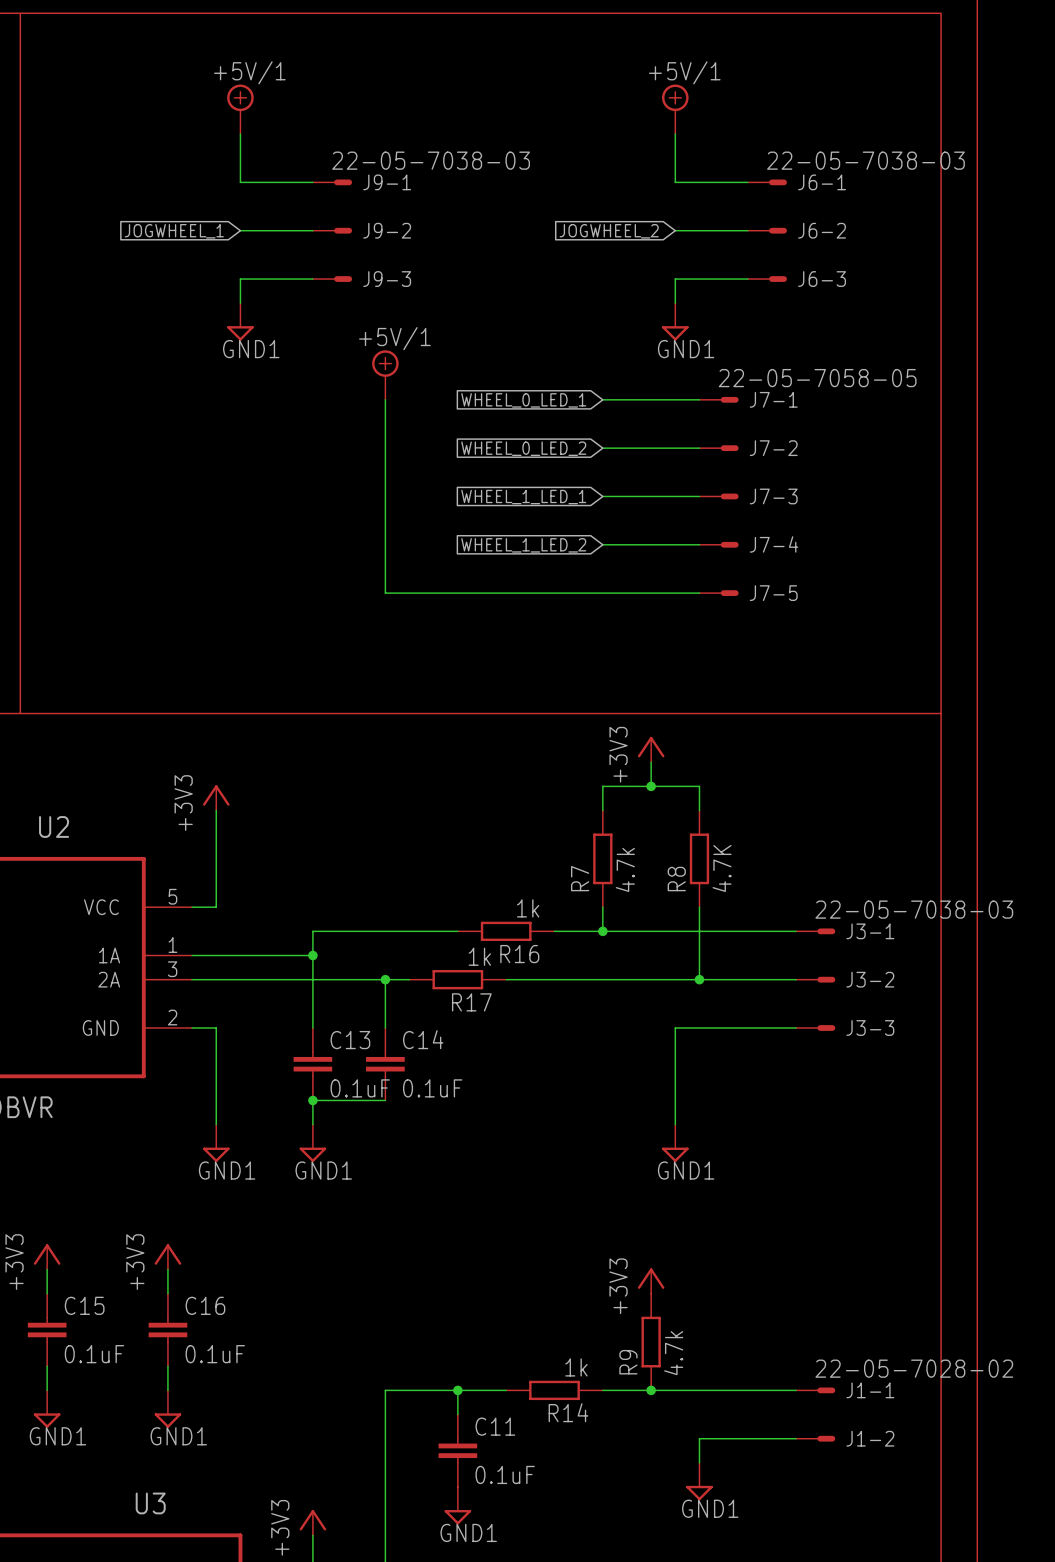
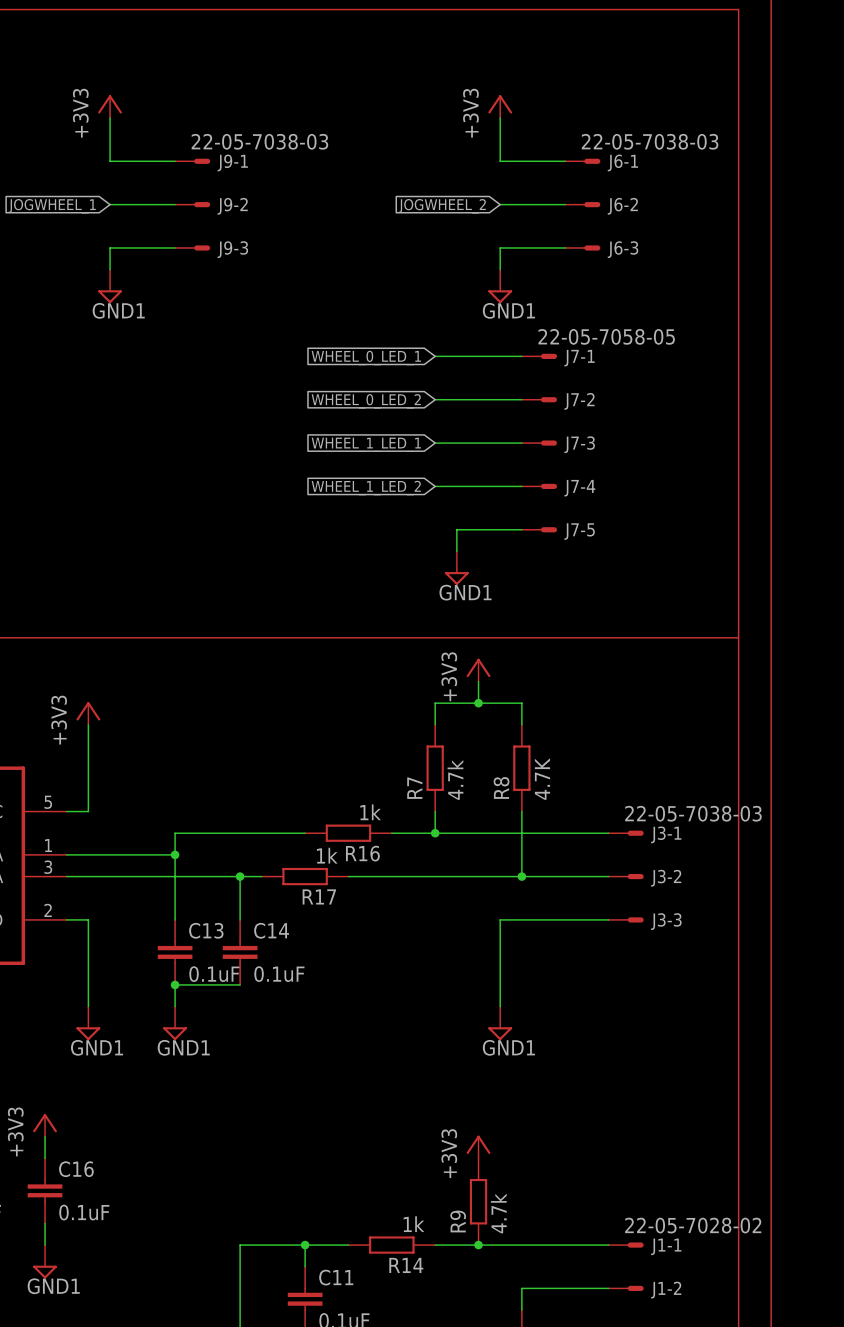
power symbol: +5V/1 (240, 109) -> none
power symbol: +5V/1 (675, 109) -> none
power symbol: none -> +3V3 (110, 106)
power symbol: none -> +3V3 (500, 106)
power symbol: +5V/1 (385, 375) -> none
wire: (385, 399) (385, 593) (626, 593) -> (456, 551) (456, 529)
power symbol: none -> GND1 (456, 568)

